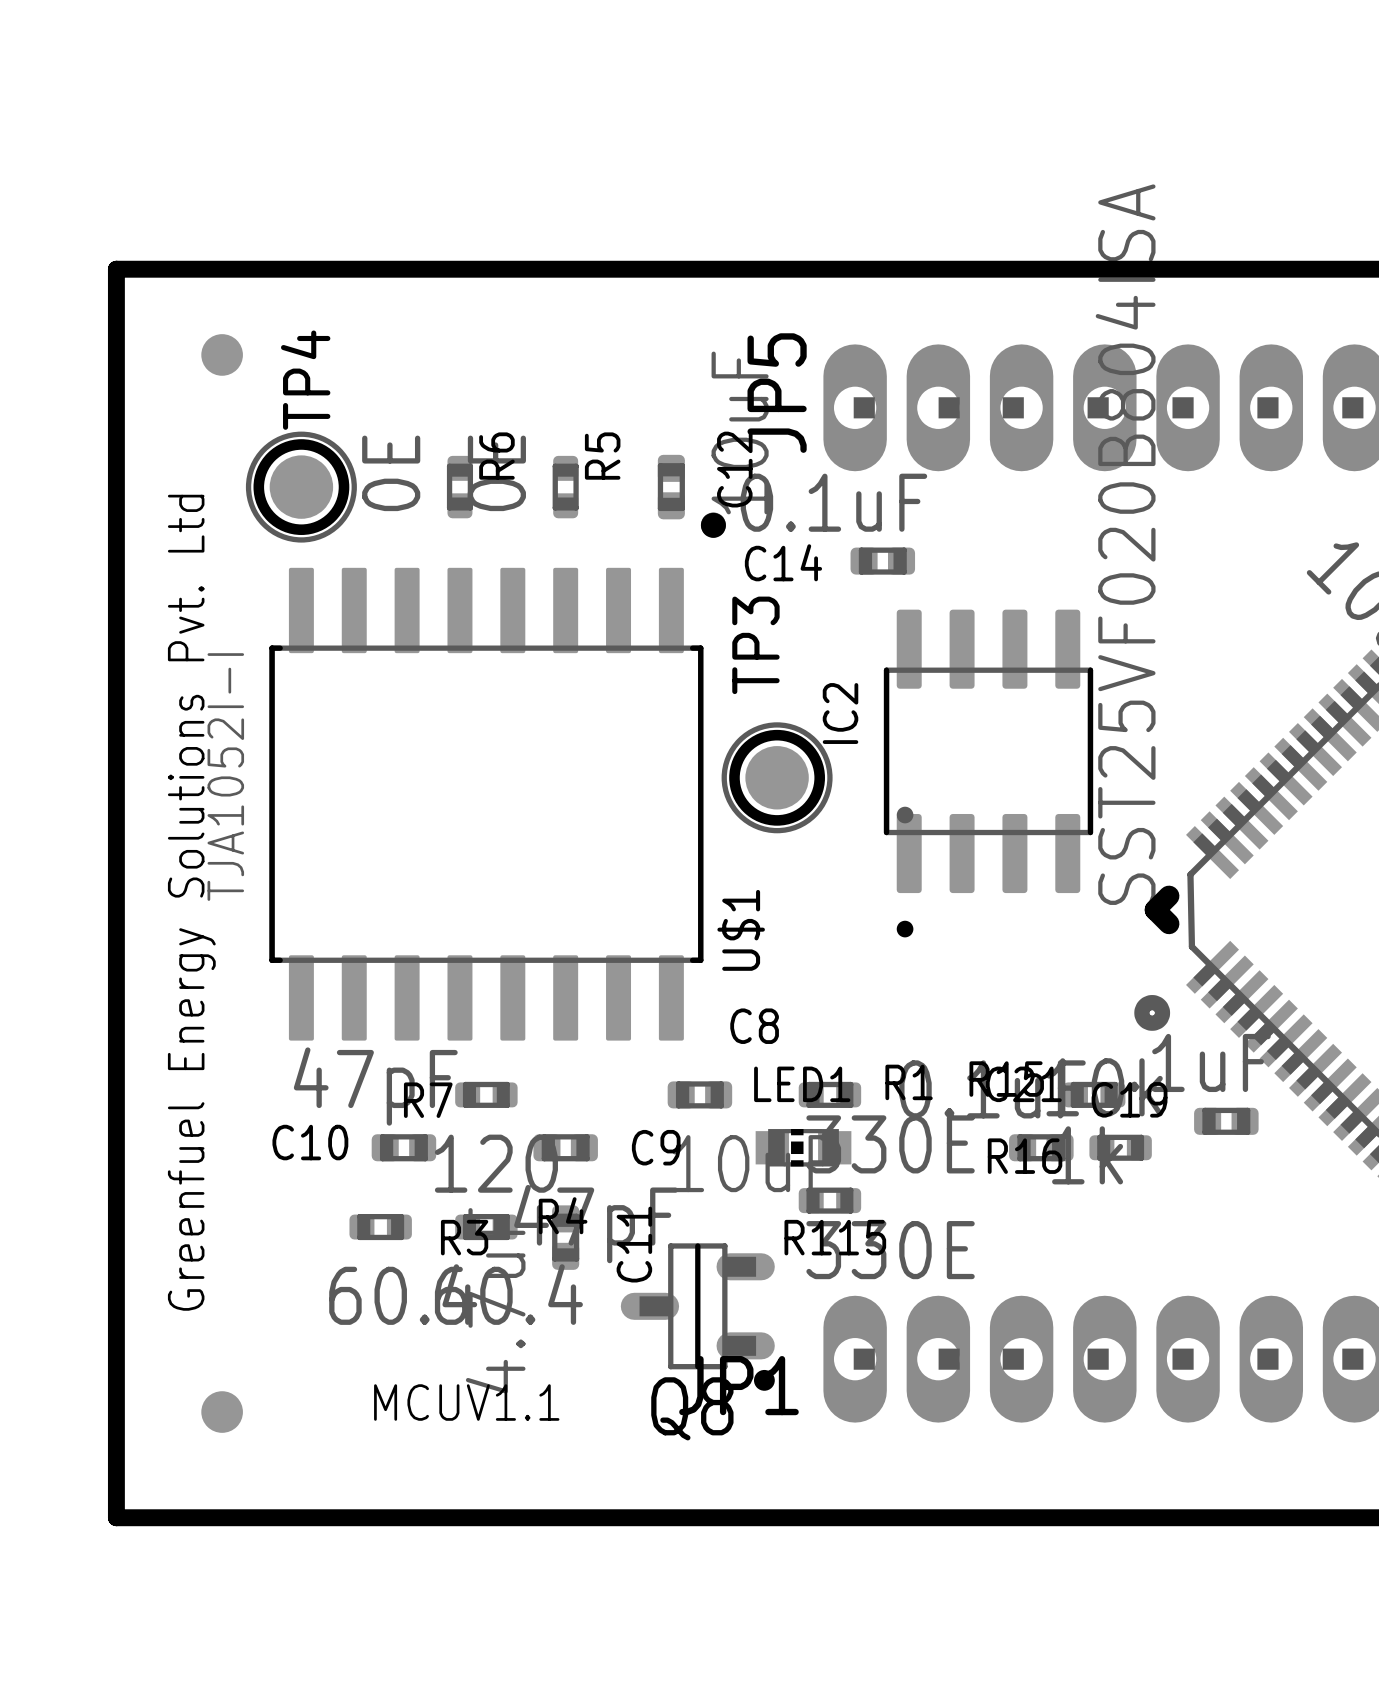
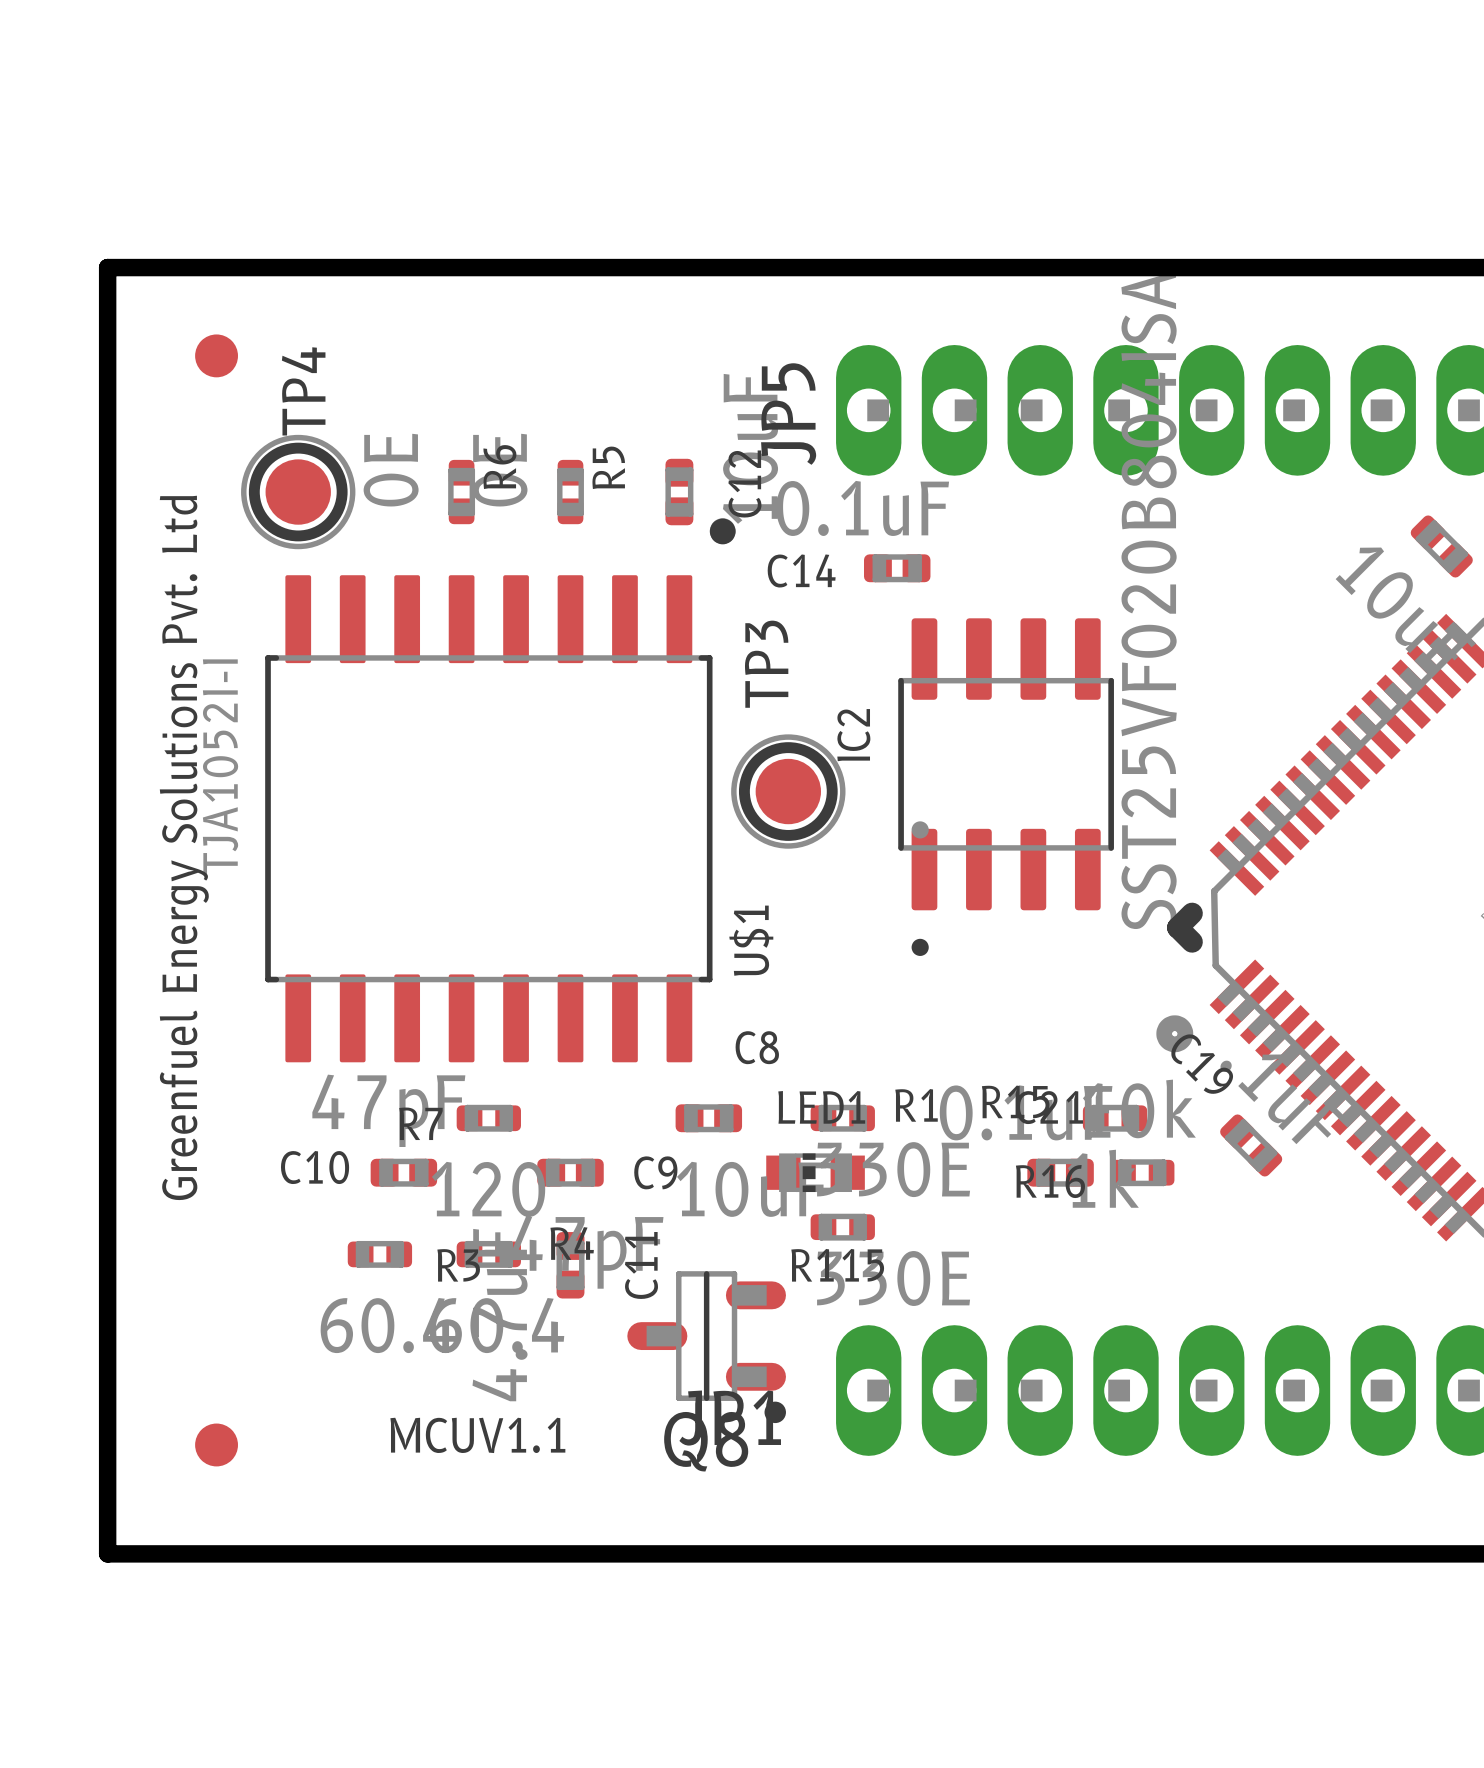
C19 rotation: 0° (1226, 1121) -> 45° clockwise (1251, 1145)

